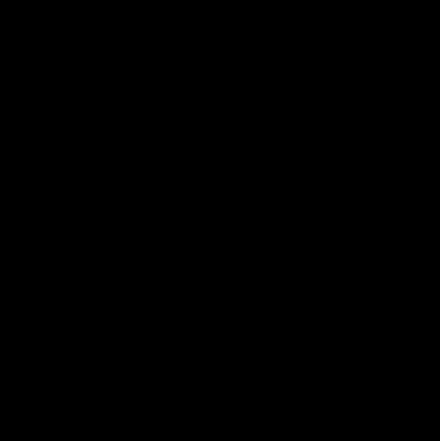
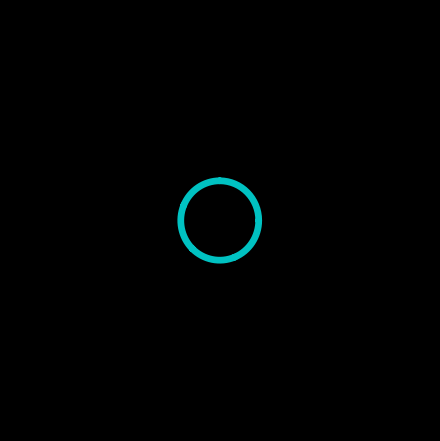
line: none -> (219, 180) (234, 183) (247, 192) (255, 205) (258, 220) (256, 234) (246, 249) (234, 257) (220, 260) (204, 256) (192, 248) (184, 236) (180, 219) (183, 205) (191, 193) (205, 183) (219, 180)

